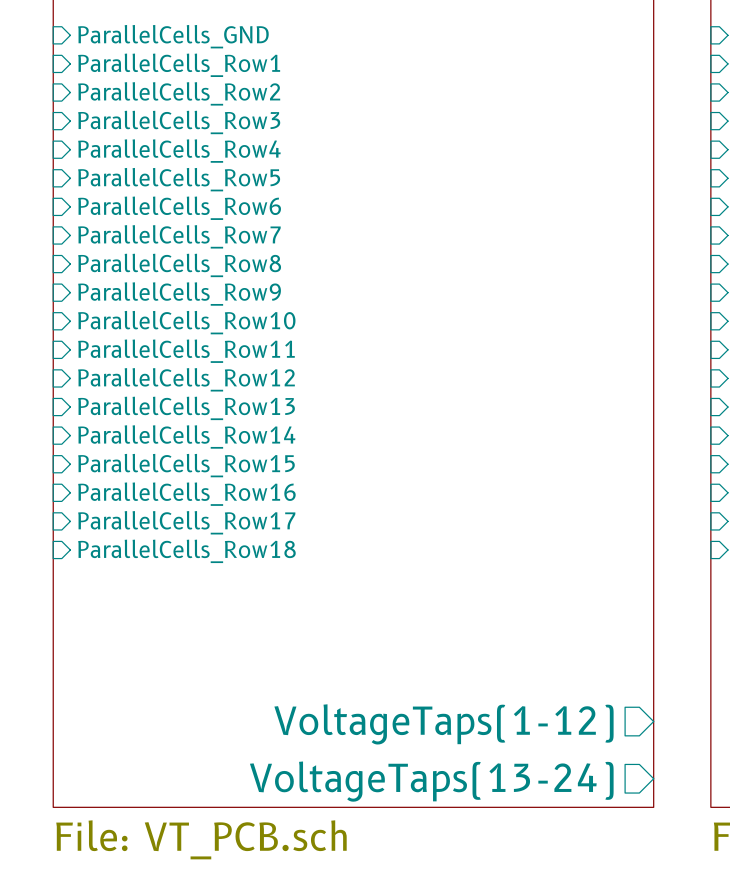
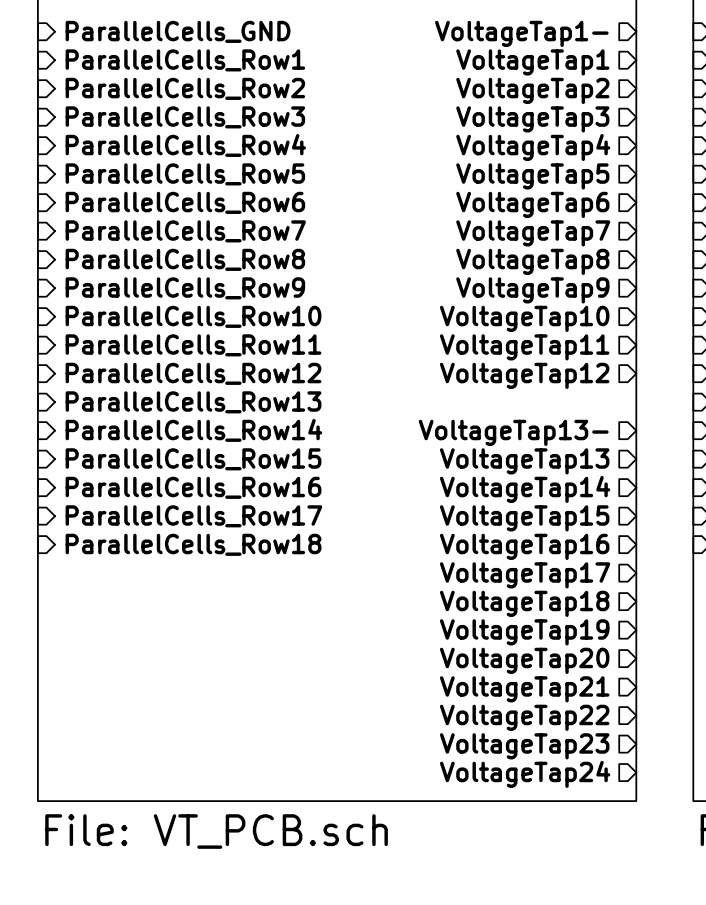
sheet pin: none -> VoltageTap1- (521, 33)
sheet pin: none -> VoltageTap1 (532, 62)
sheet pin: none -> VoltageTap2 (532, 90)
sheet pin: none -> VoltageTap3 (532, 119)
sheet pin: none -> VoltageTap4 (533, 147)
sheet pin: none -> VoltageTap5 (532, 176)
sheet pin: none -> VoltageTap6 (532, 204)
sheet pin: none -> VoltageTap7 (533, 233)
sheet pin: none -> VoltageTap8 (532, 261)
sheet pin: none -> VoltageTap9 (532, 290)
sheet pin: none -> VoltageTap10 (524, 318)
sheet pin: none -> VoltageTap11 (524, 347)
sheet pin: none -> VoltageTap12 (524, 375)
sheet pin: none -> VoltageTap13- (513, 432)
sheet pin: none -> VoltageTap13 (524, 461)
sheet pin: none -> VoltageTap14 (525, 489)
sheet pin: none -> VoltageTap15 (524, 518)
sheet pin: none -> VoltageTap16 (524, 546)
sheet pin: none -> VoltageTap17 (525, 575)
sheet pin: none -> VoltageTap18 (524, 603)
sheet pin: none -> VoltageTap19 (524, 632)
sheet pin: none -> VoltageTap20 (524, 660)
sheet pin: none -> VoltageTap21 (524, 689)
sheet pin: VoltageTaps(1-12) (443, 724) -> VoltageTap22 (524, 717)
sheet pin: none -> VoltageTap23 (524, 746)
sheet pin: VoltageTaps(13-24) (431, 781) -> VoltageTap24 (525, 774)

